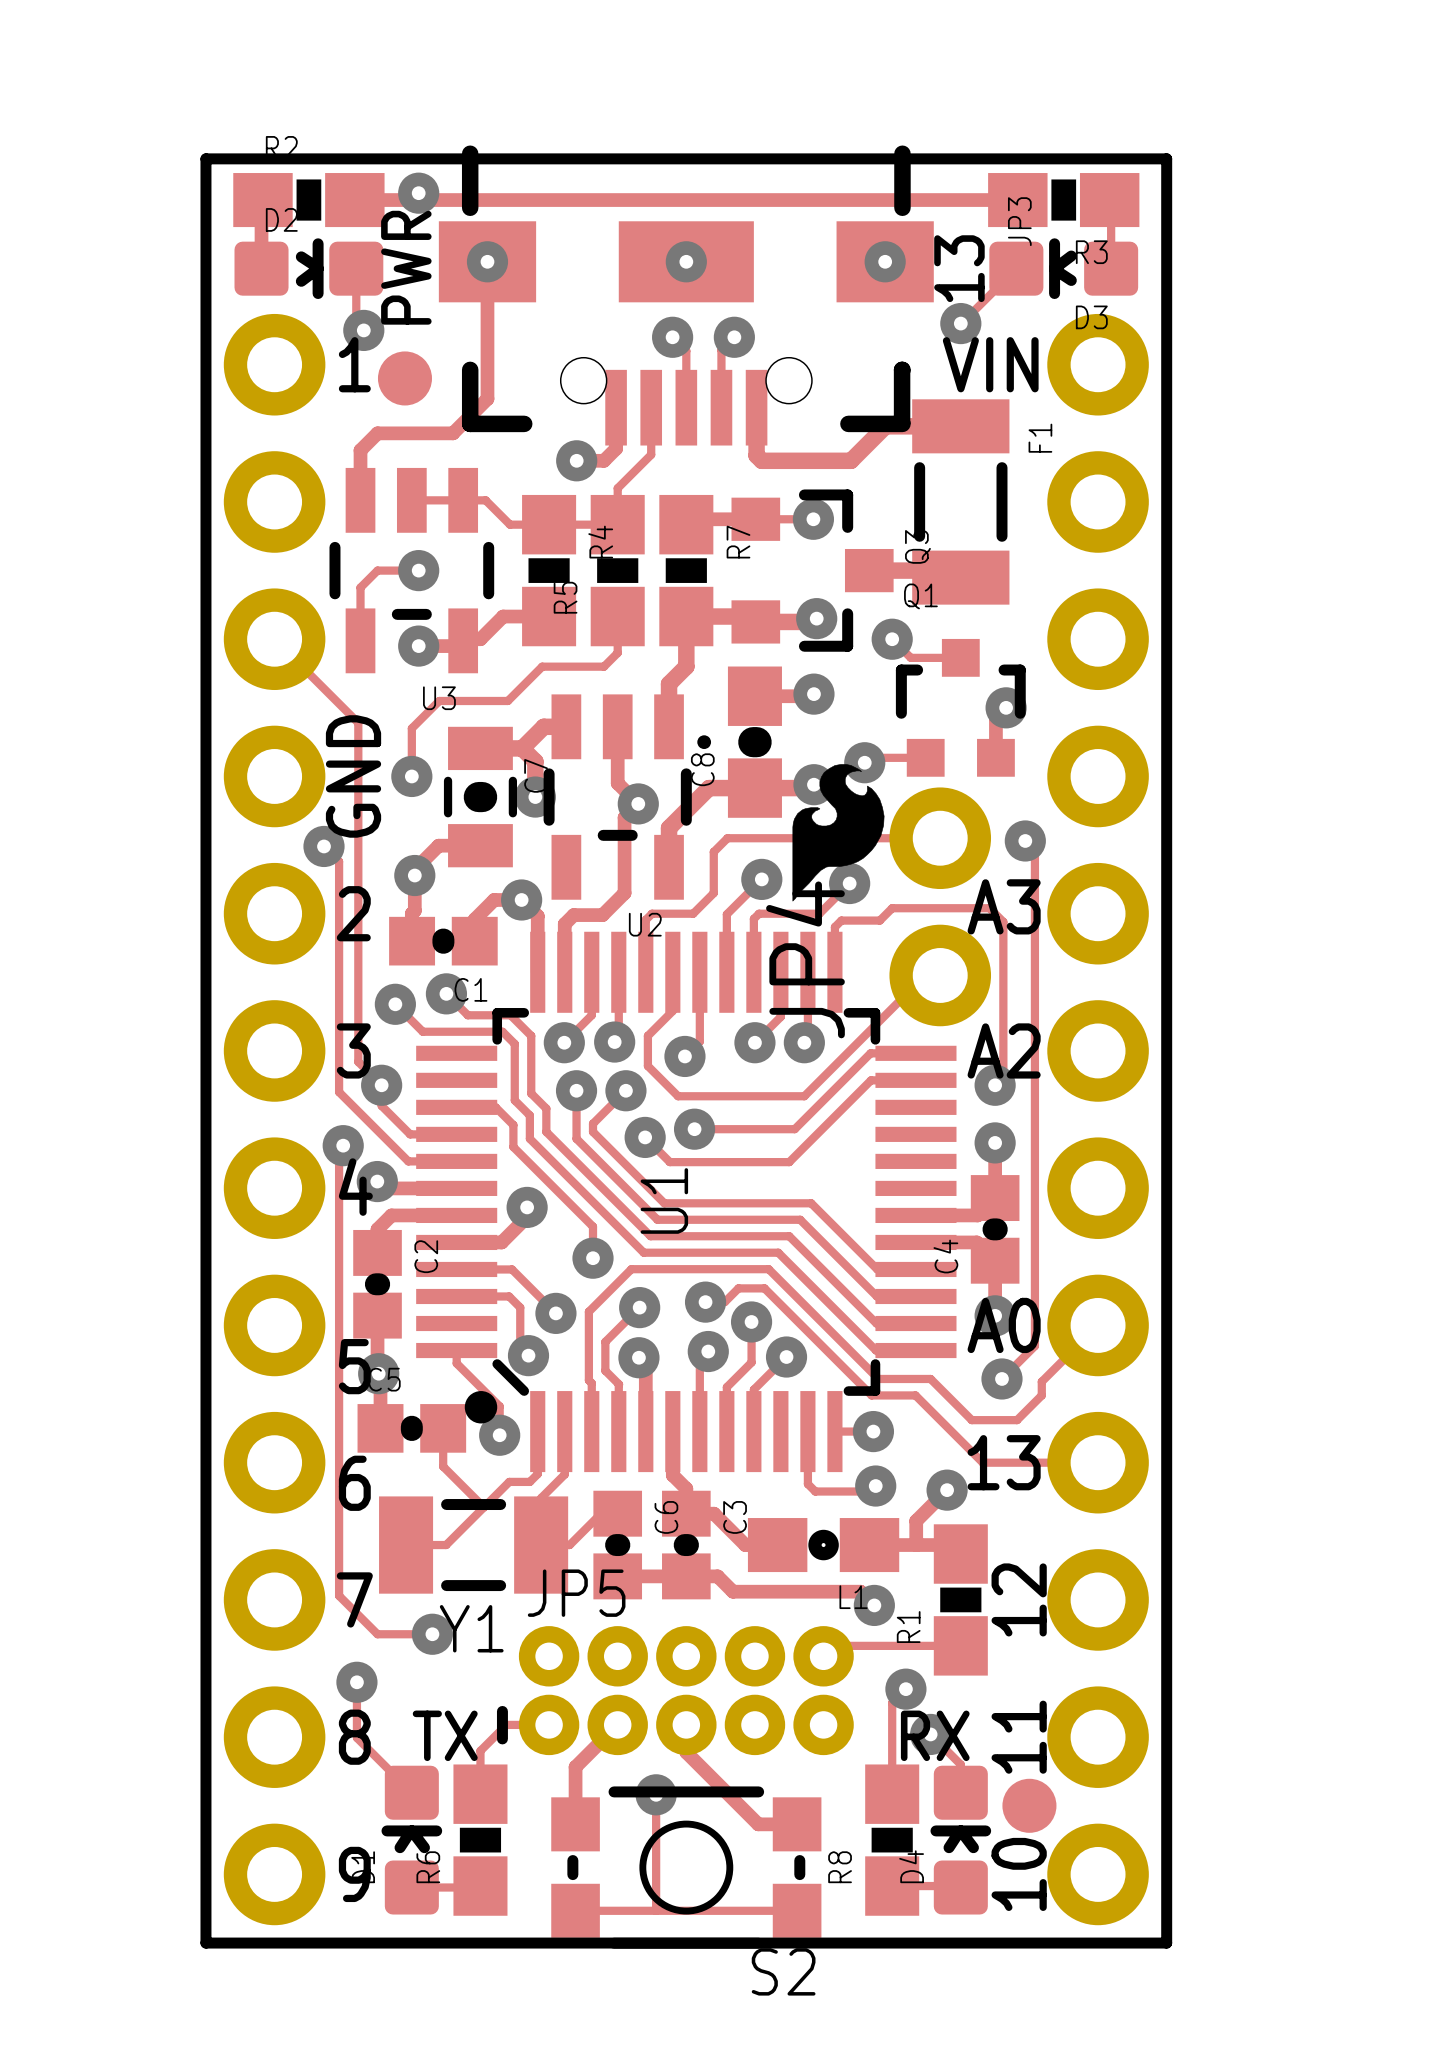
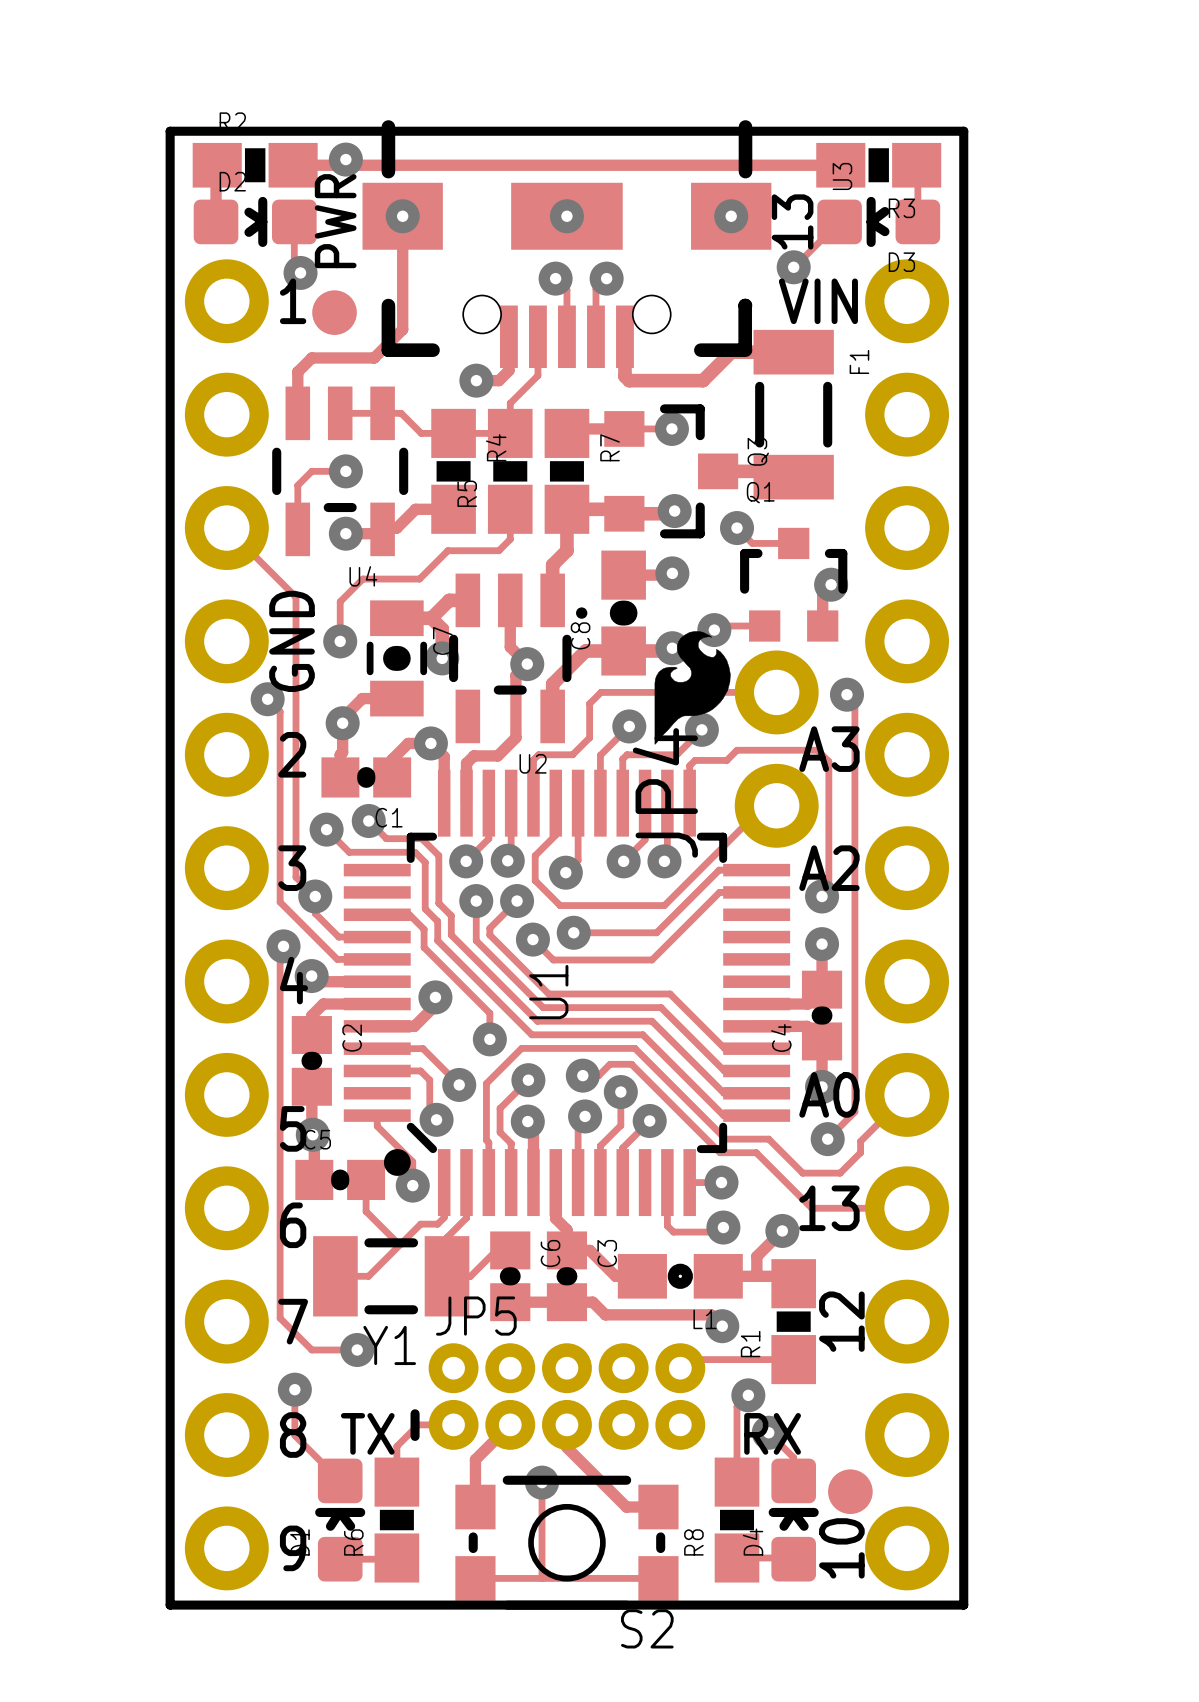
JP3 name: JP3 (1019, 221) -> U3 (842, 176)
U3 name: U3 (439, 698) -> U4 (363, 576)
text: 11 (1019, 1737) -> none

